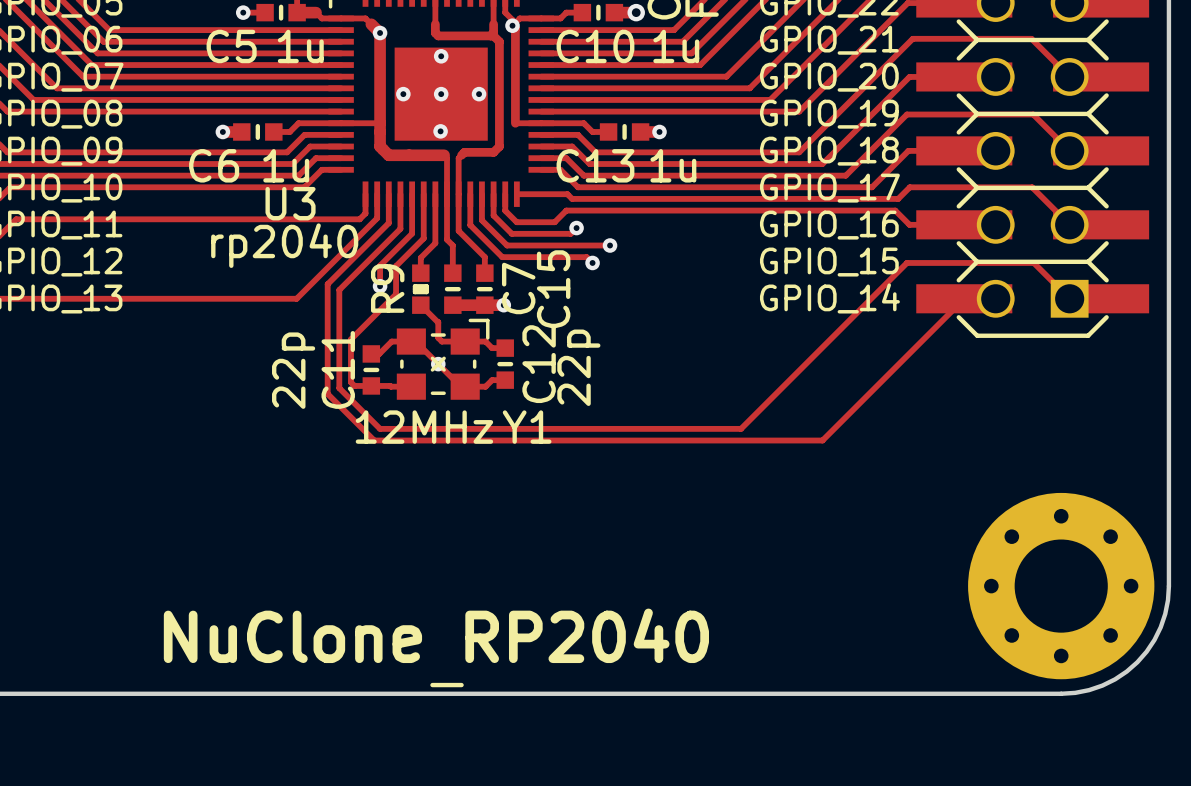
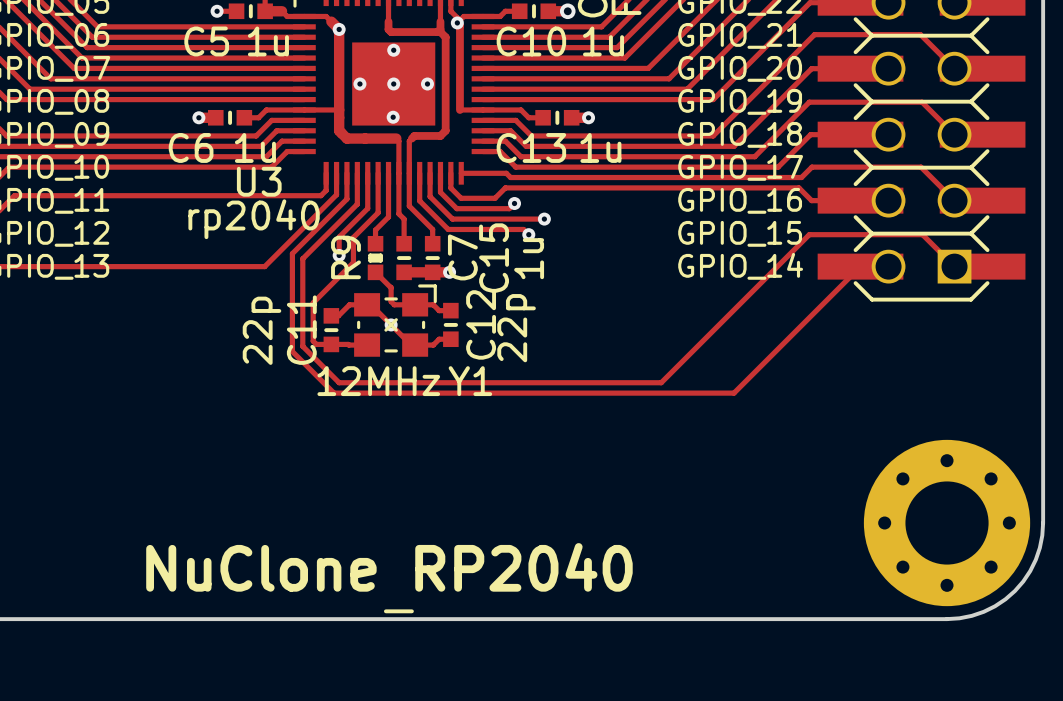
C7 value: none -> 1u (529, 258)

